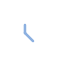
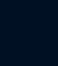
bottom track: (24, 24) (24, 33) (33, 41) -> none

